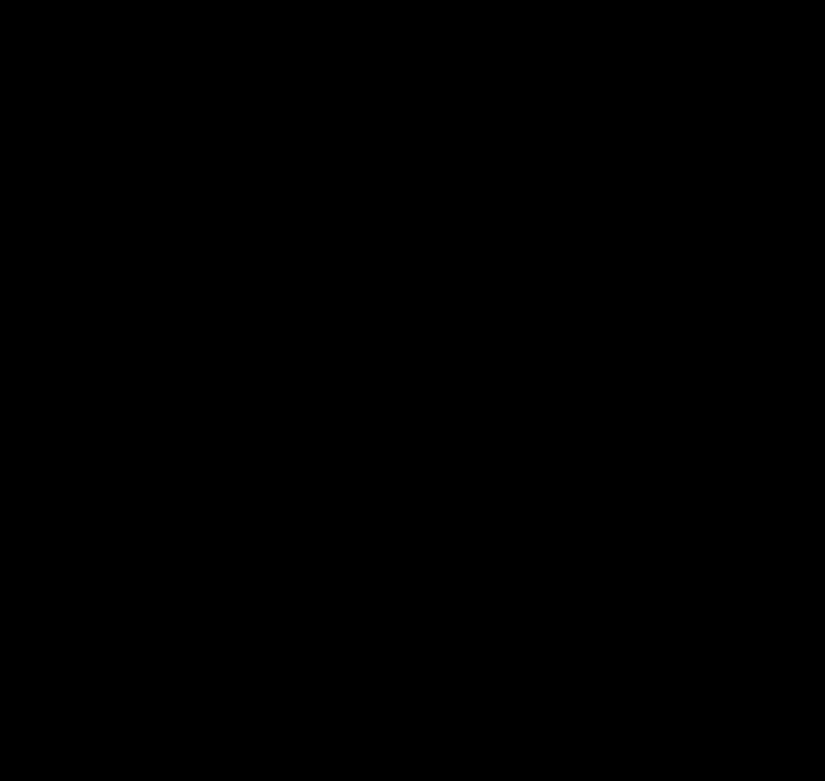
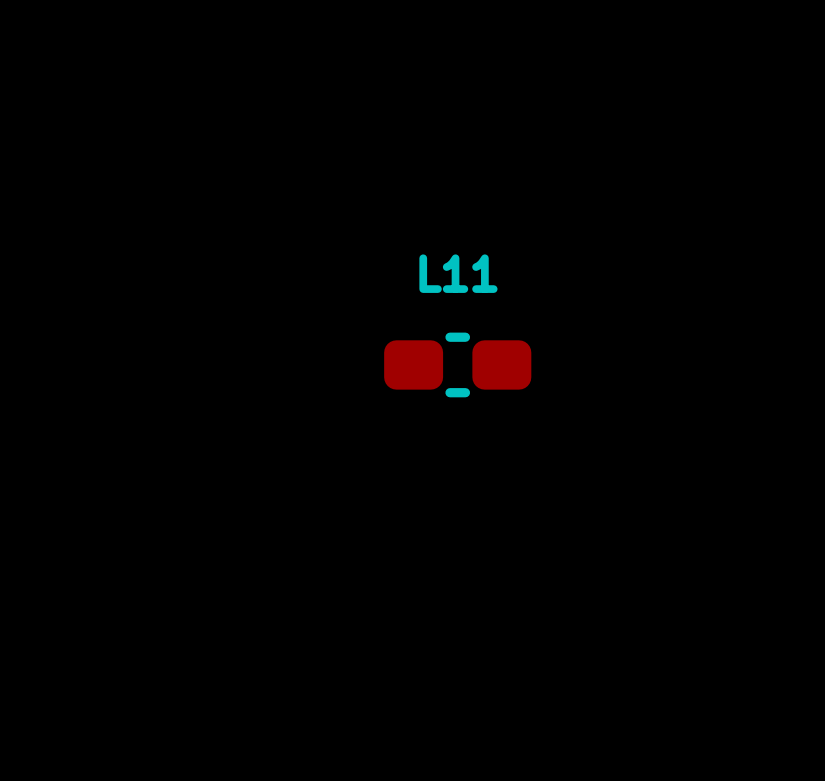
L11: none -> (457, 364)

